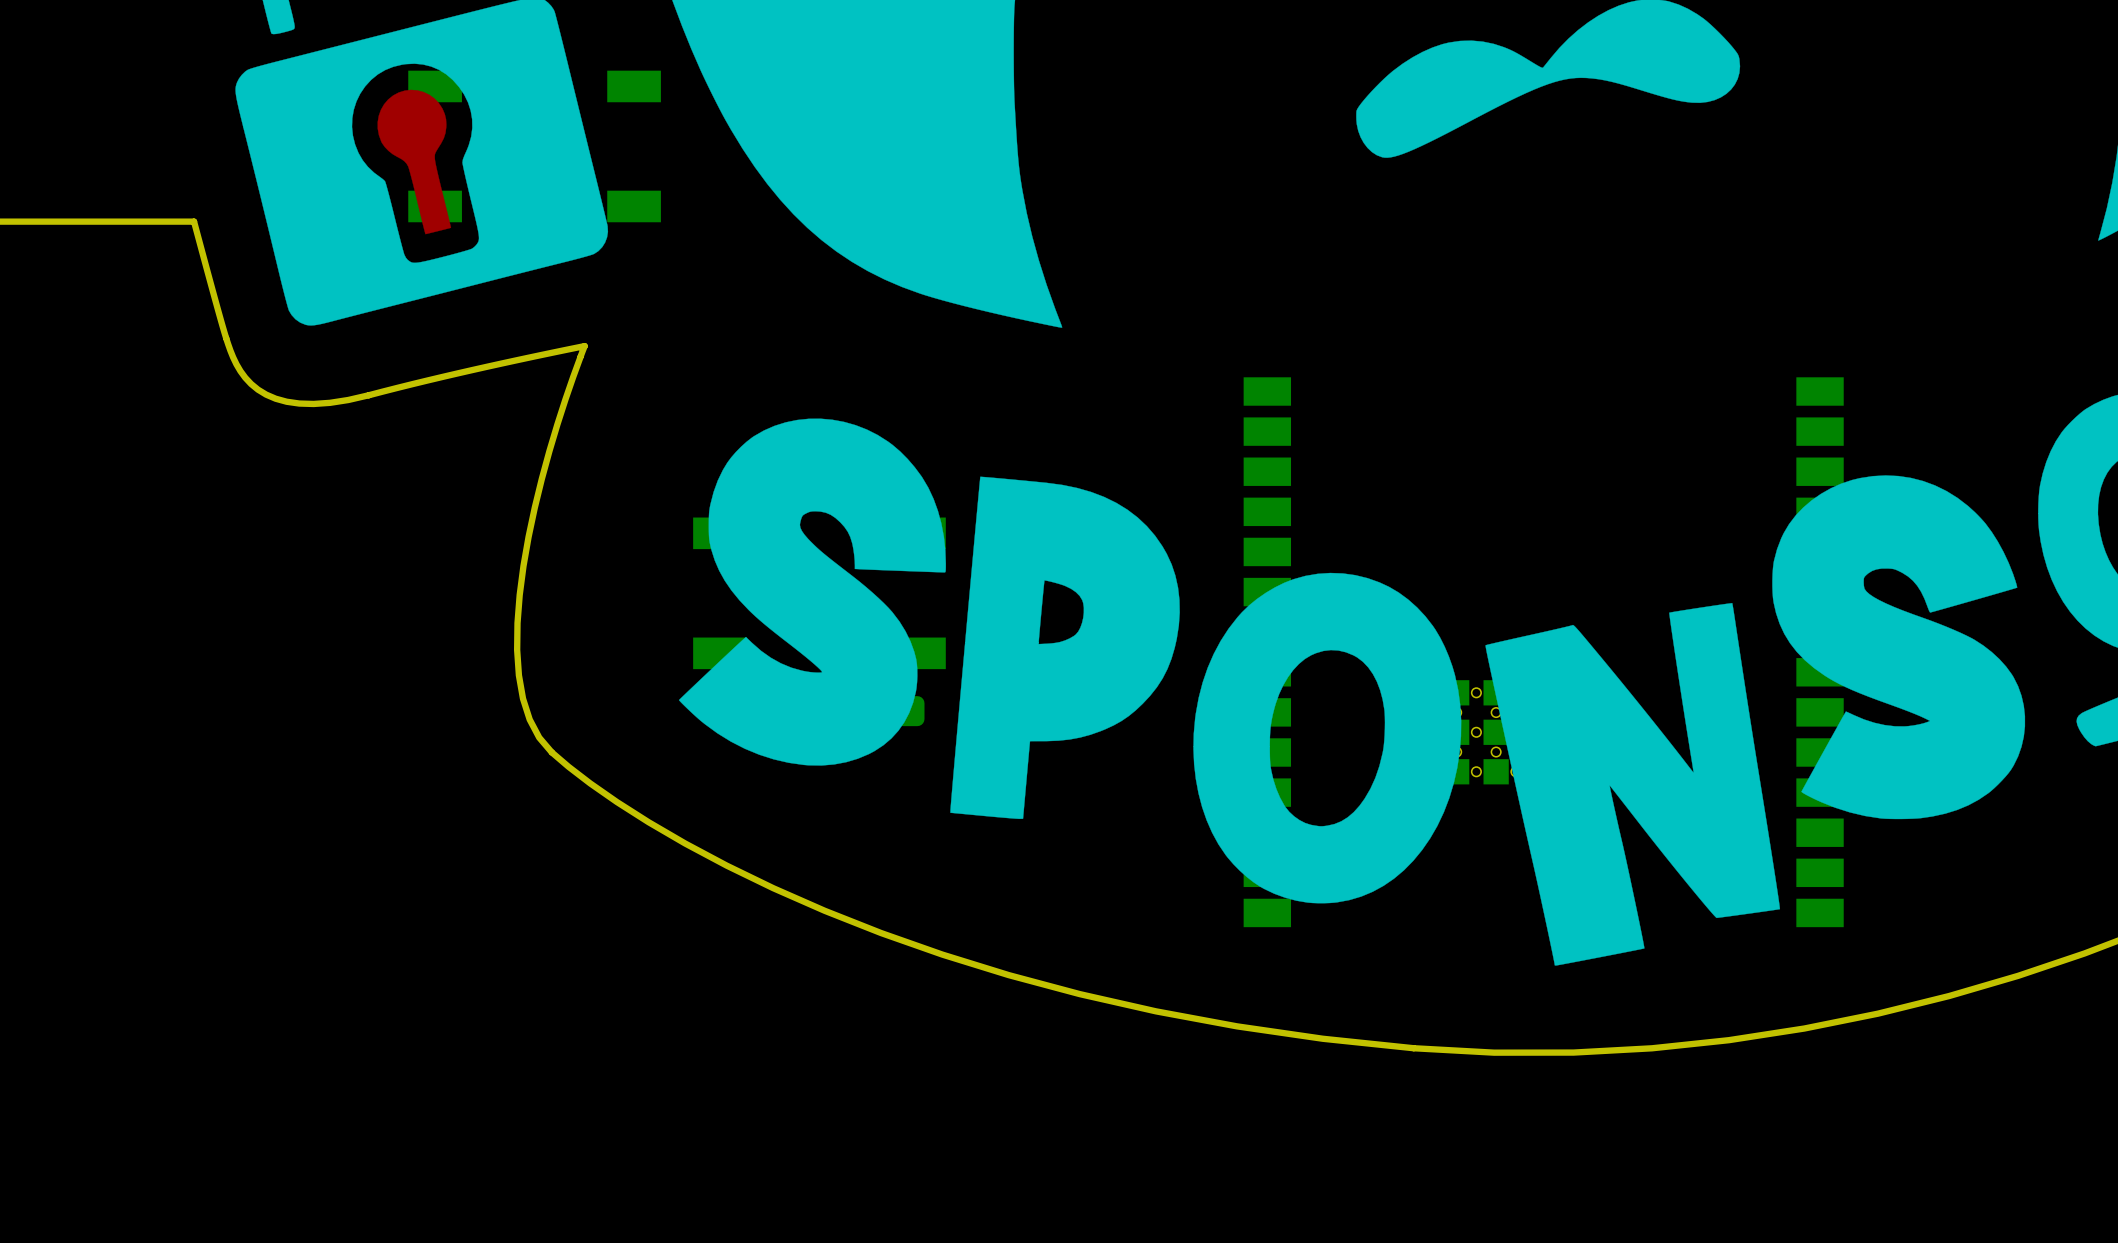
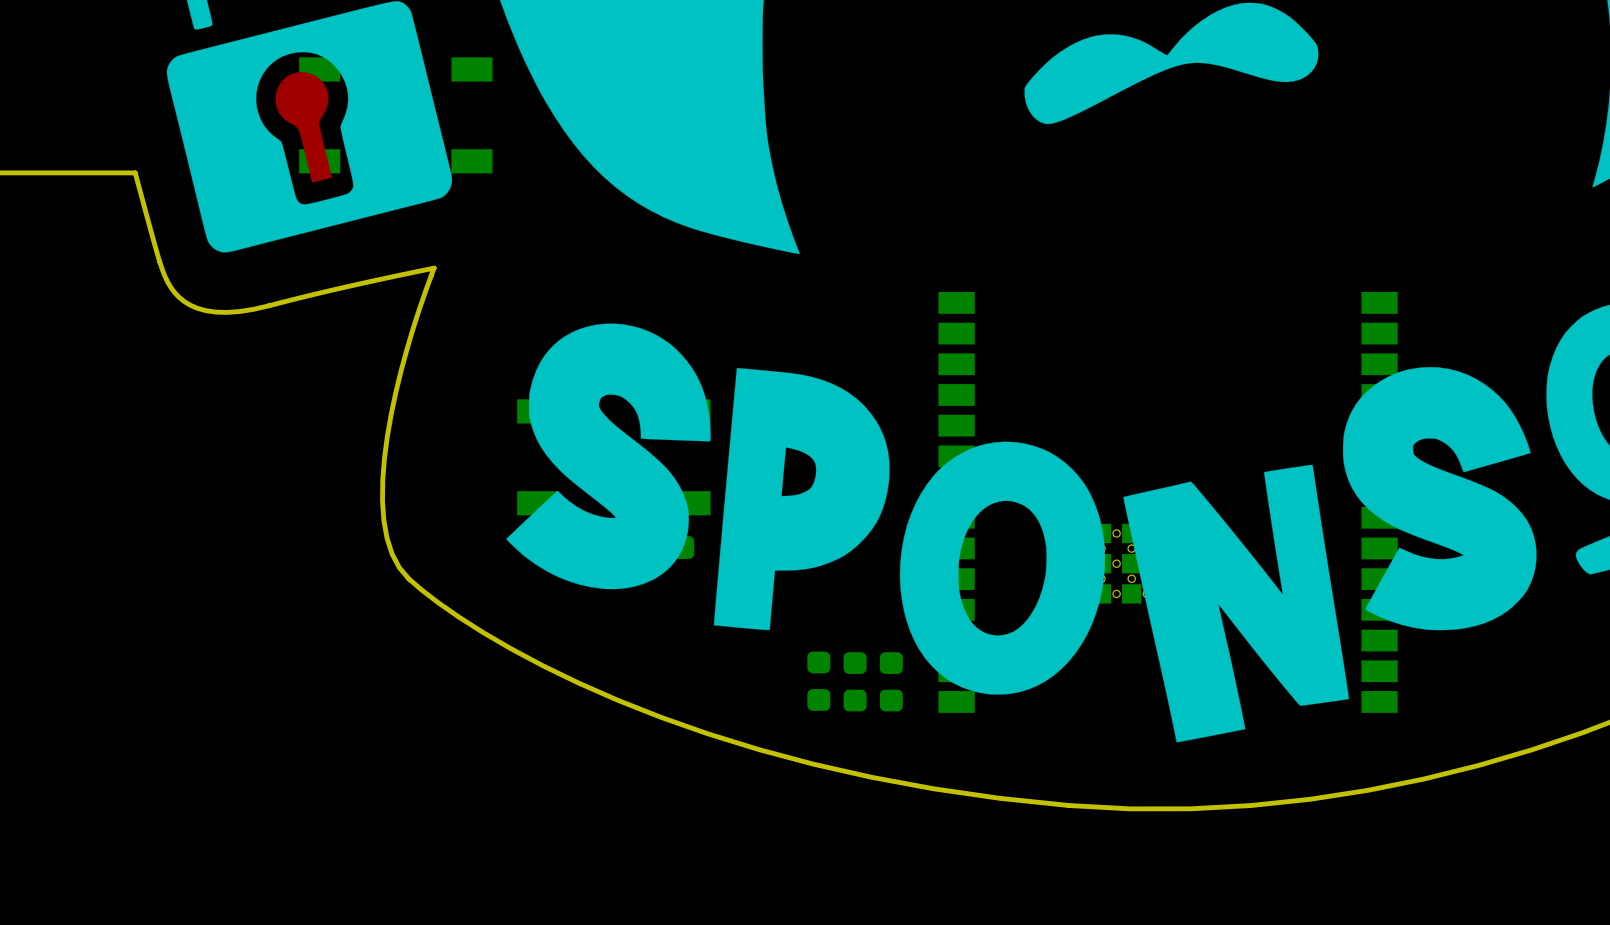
part: none -> (818, 681)
part: none -> (855, 681)
part: none -> (891, 681)

